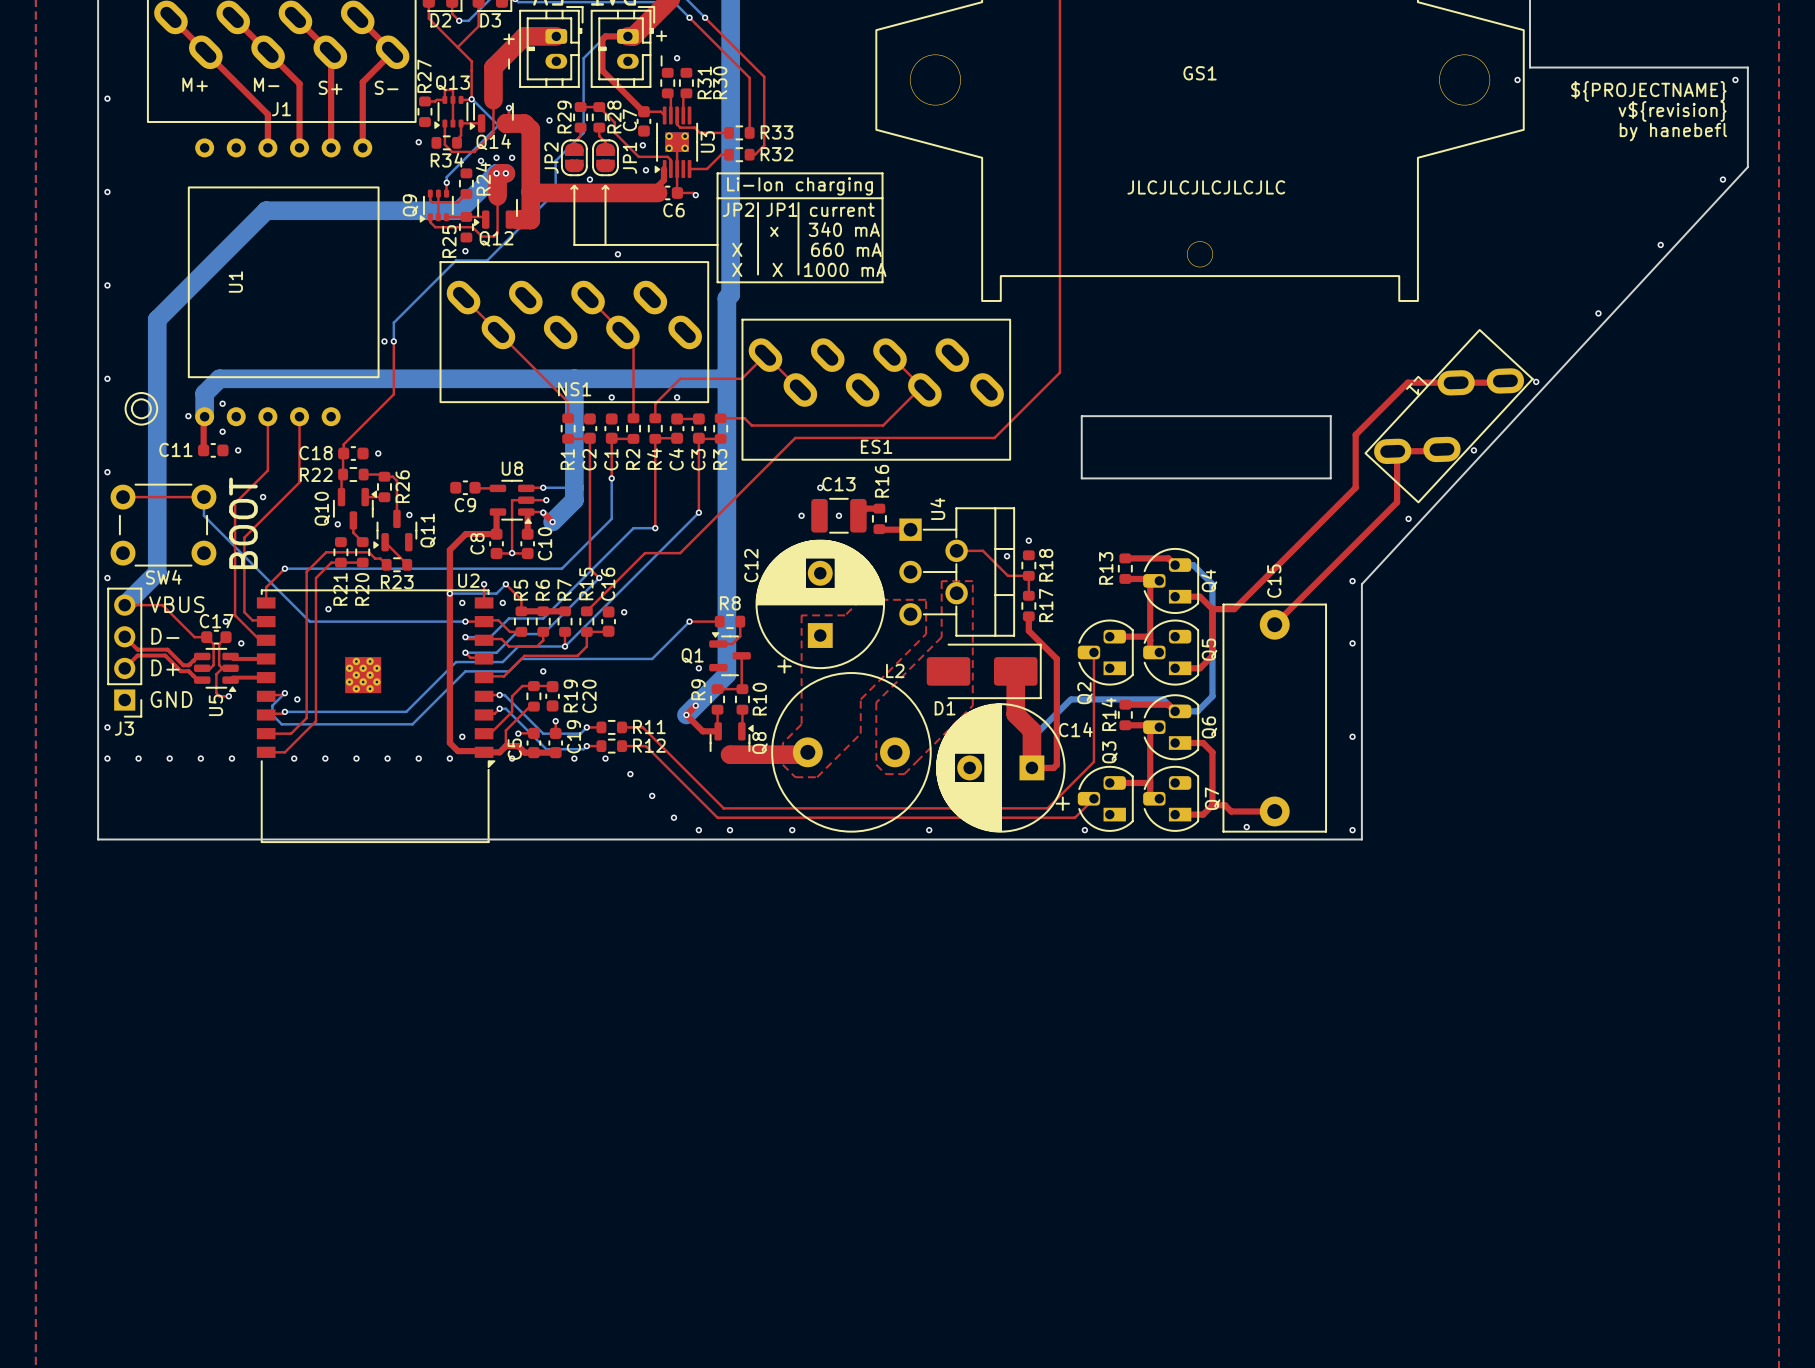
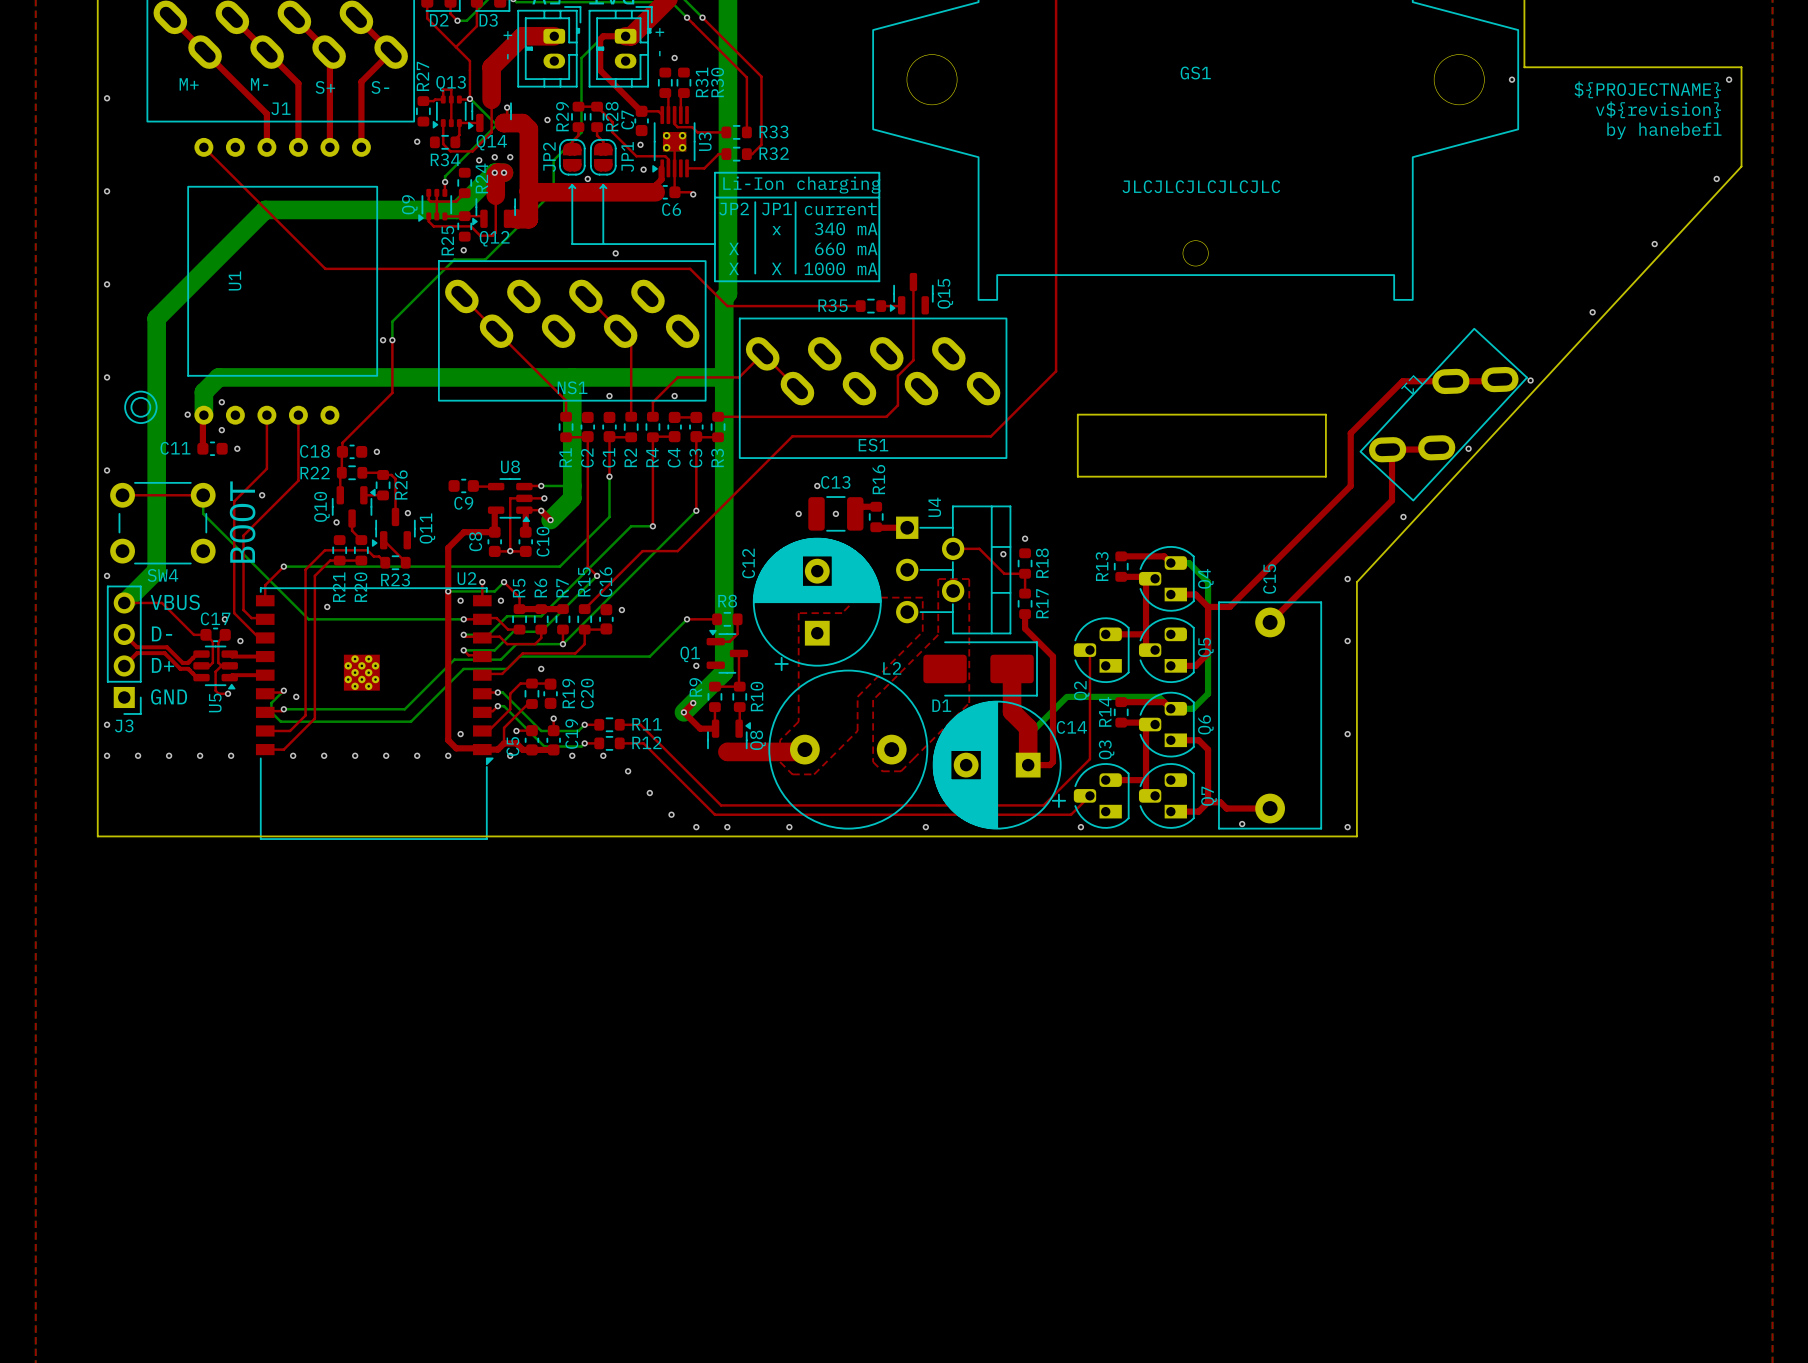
top track: none -> (203, 147) (325, 268) (690, 268) (727, 306) (860, 306)
Q15: none -> (911, 293)
top track: none -> (901, 305) (881, 306)
R35: none -> (870, 306)
top track: (893, 358) (921, 386) (883, 425) (751, 425) (744, 418) -> (913, 282) (913, 360) (897, 375) (897, 405) (886, 416) (741, 416)

